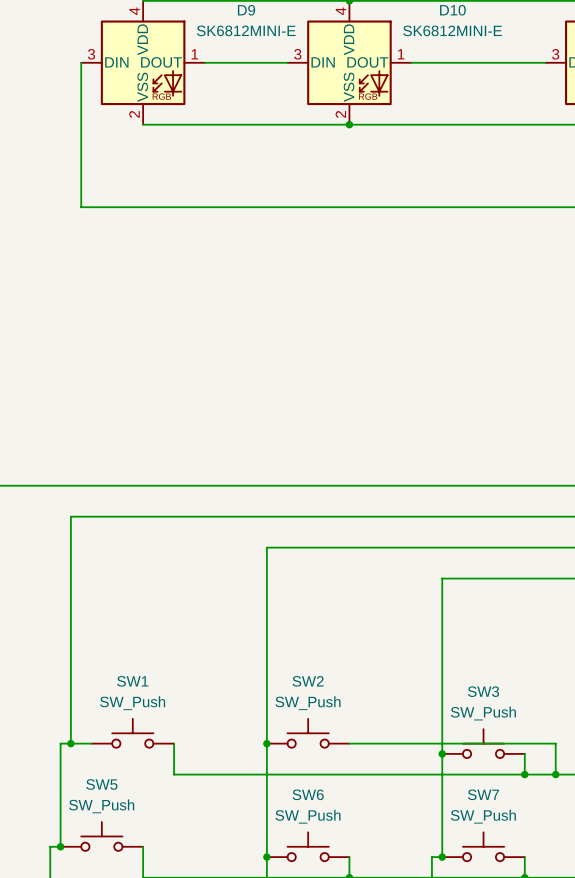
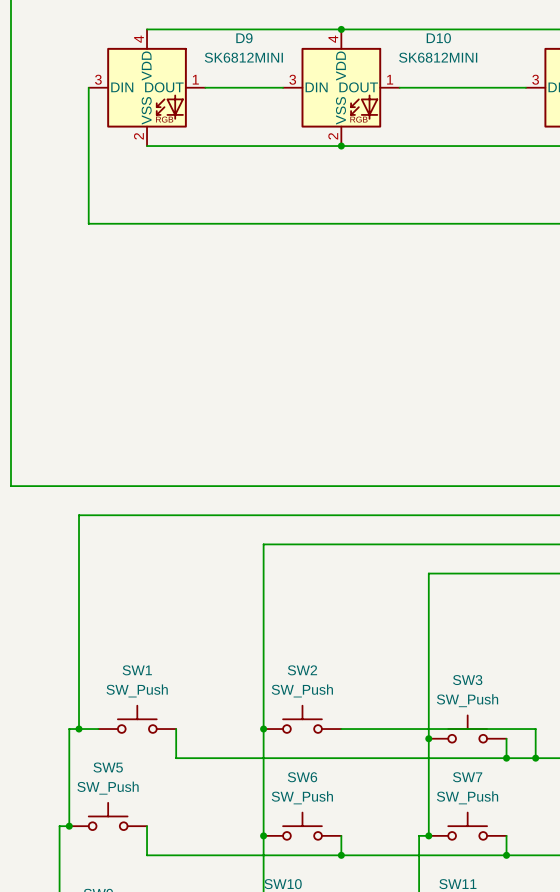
D9 value: SK6812MINI-E (246, 30) -> SK6812MINI (243, 57)
D10 value: SK6812MINI-E (452, 30) -> SK6812MINI (438, 57)

